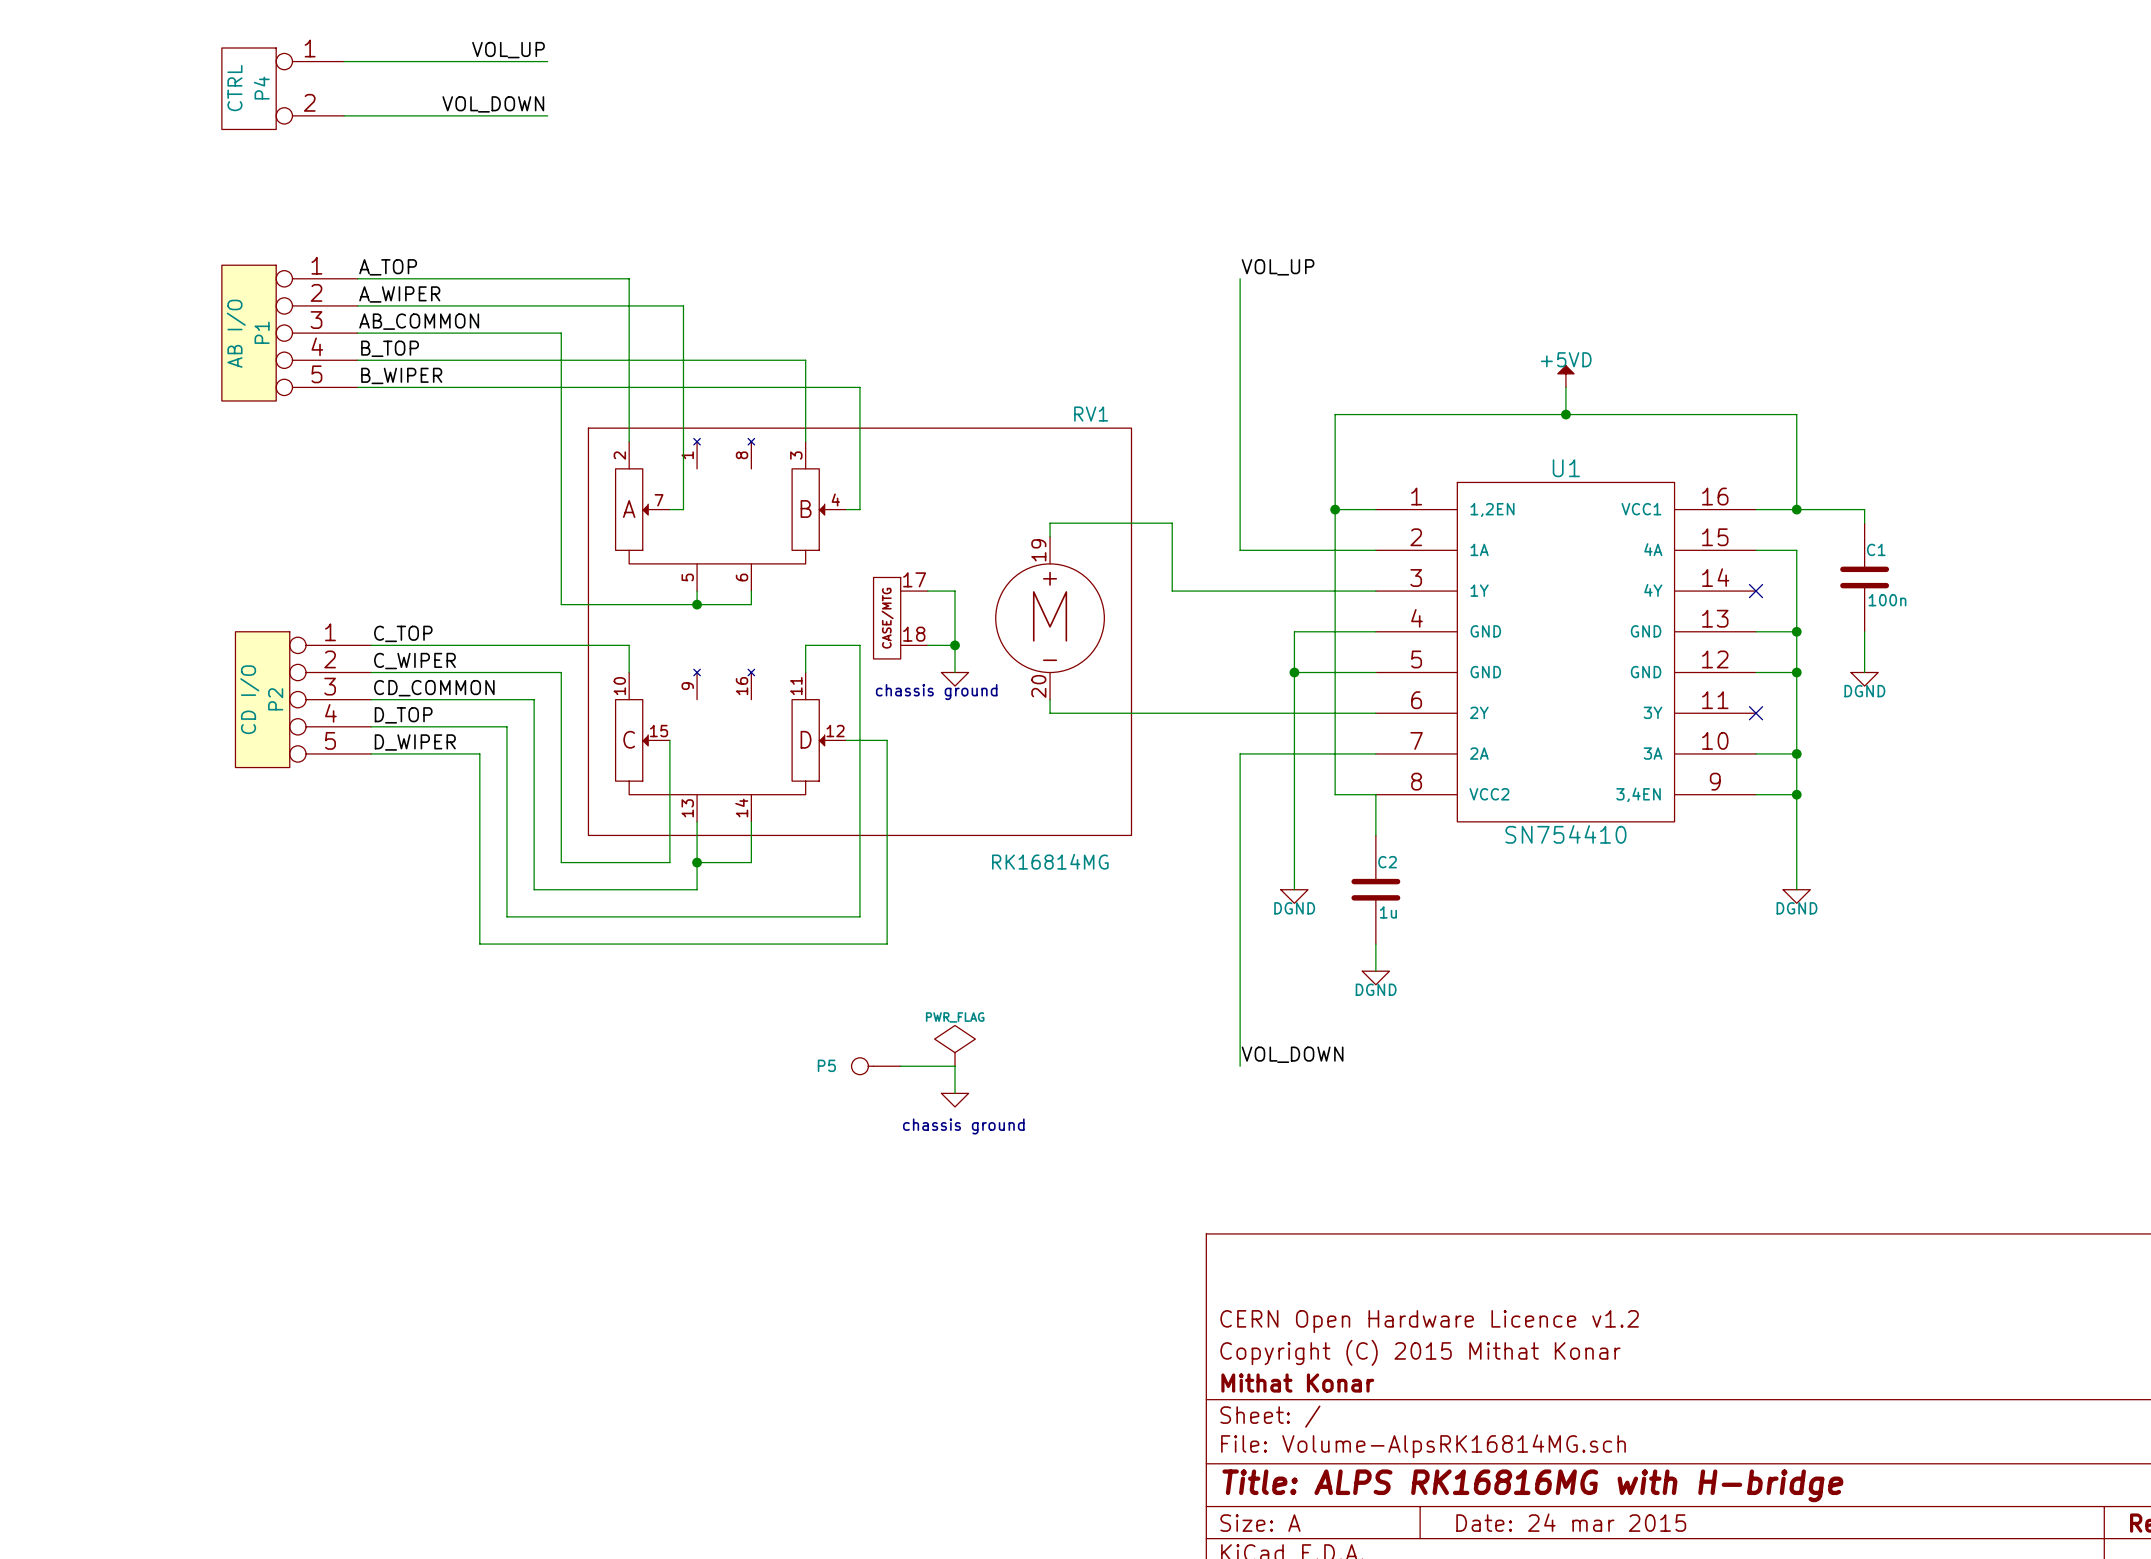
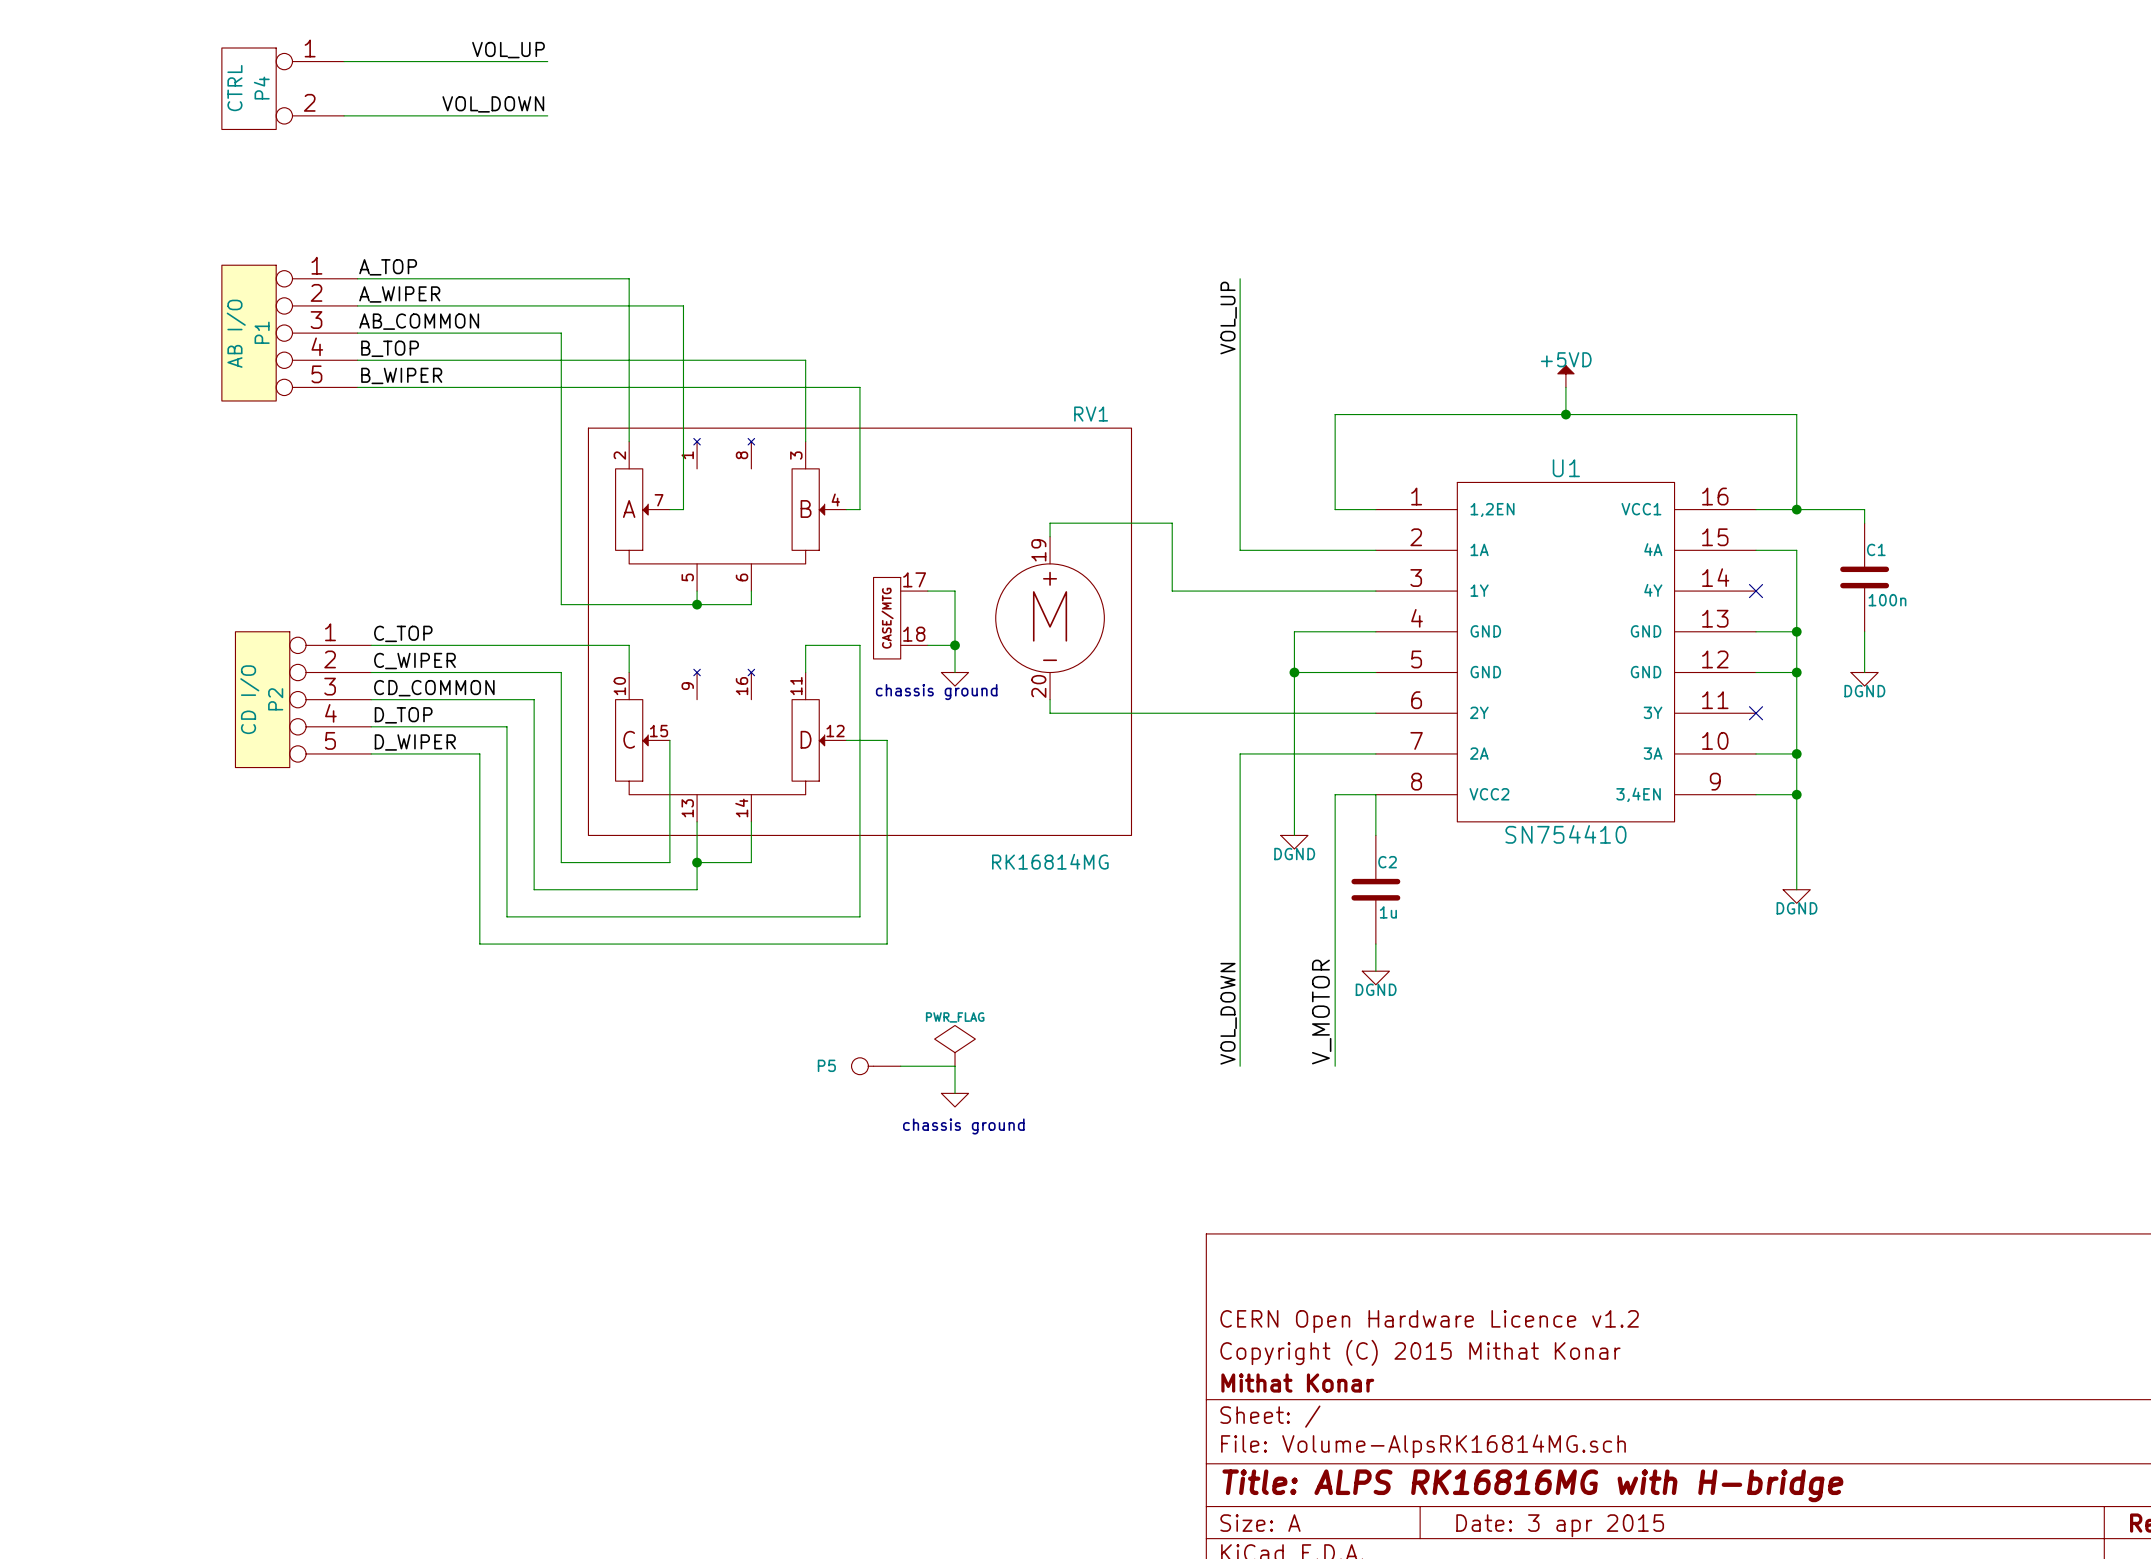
label rotation: 0° (1278, 267) -> 90° counterclockwise (1228, 318)
wire: (1335, 509) (1335, 794) -> (1335, 1066) (1335, 794)
junction: (1335, 509) -> none
wire: (1294, 835) (1294, 889) -> none
power symbol position: DGND (1294, 896) -> DGND (1294, 842)
label: none -> V_MOTOR (1321, 1012)
label rotation: 0° (1292, 1054) -> 90° counterclockwise (1228, 1013)
title block: Date: 24 mar 2015 (1571, 1522) -> Date: 3 apr 2015 (1560, 1525)

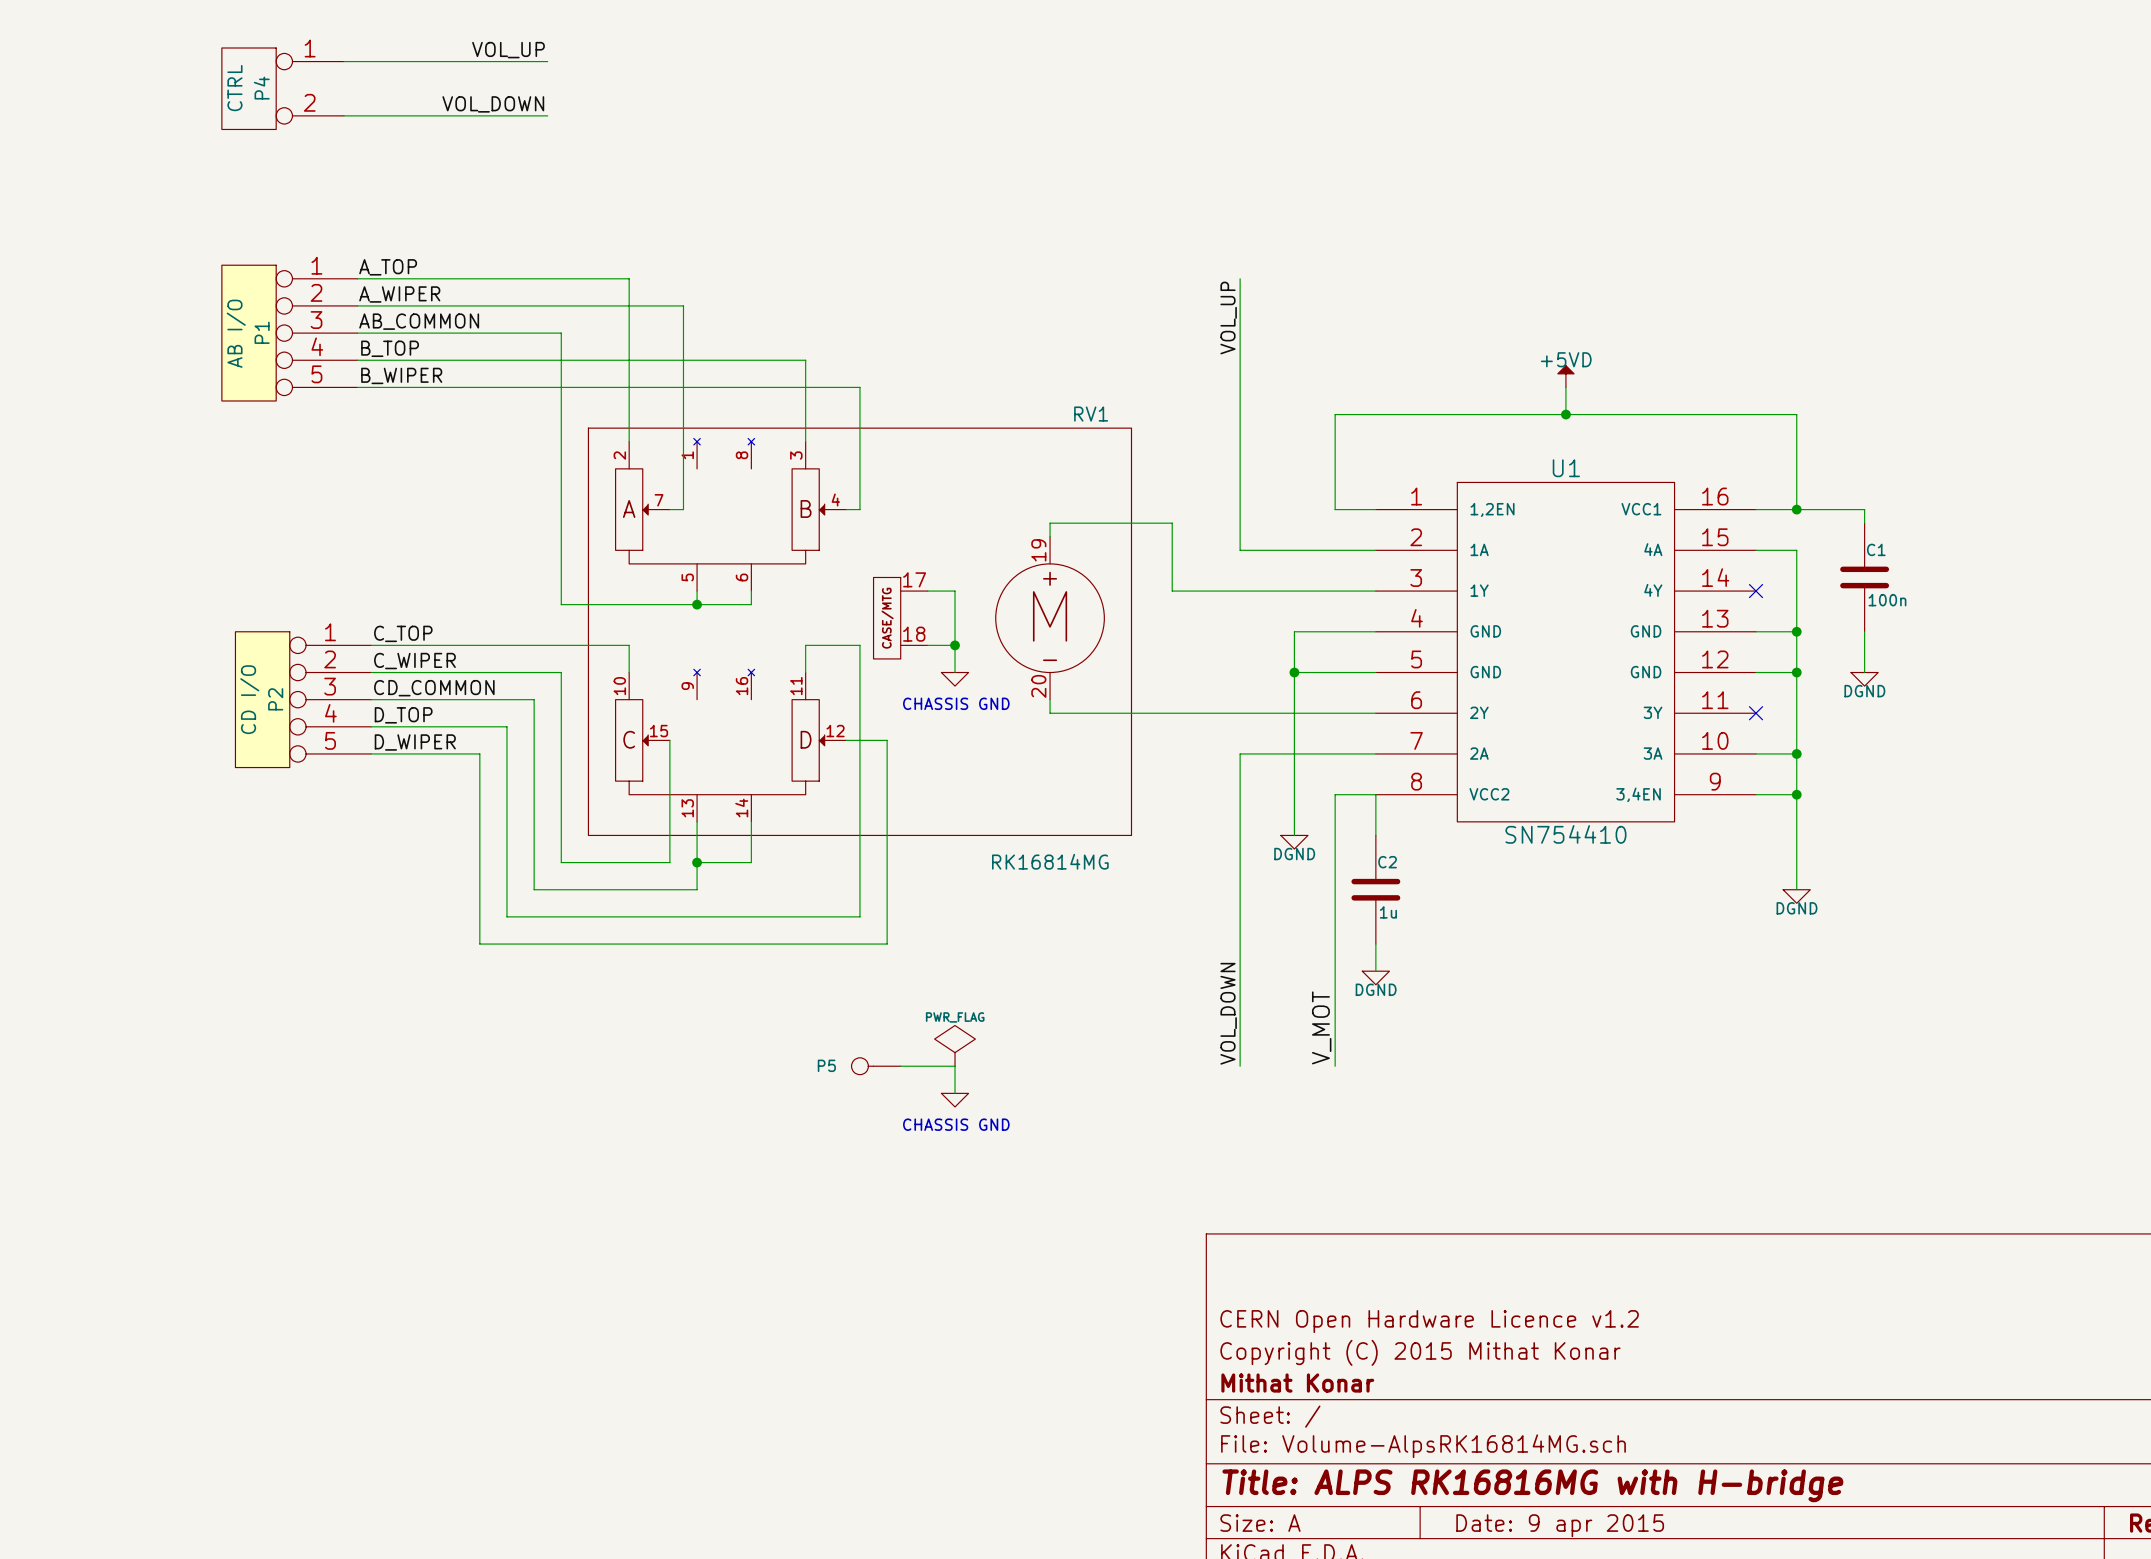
text: chassis ground (936, 692) -> none
text: none -> CHASSIS GND (956, 703)
label: V_MOTOR (1321, 1012) -> V_MOT (1321, 1027)
text: chassis ground (963, 1126) -> CHASSIS GND (956, 1124)
title block: Date: 3 apr 2015 (1560, 1525) -> Date: 9 apr 2015 (1560, 1525)

